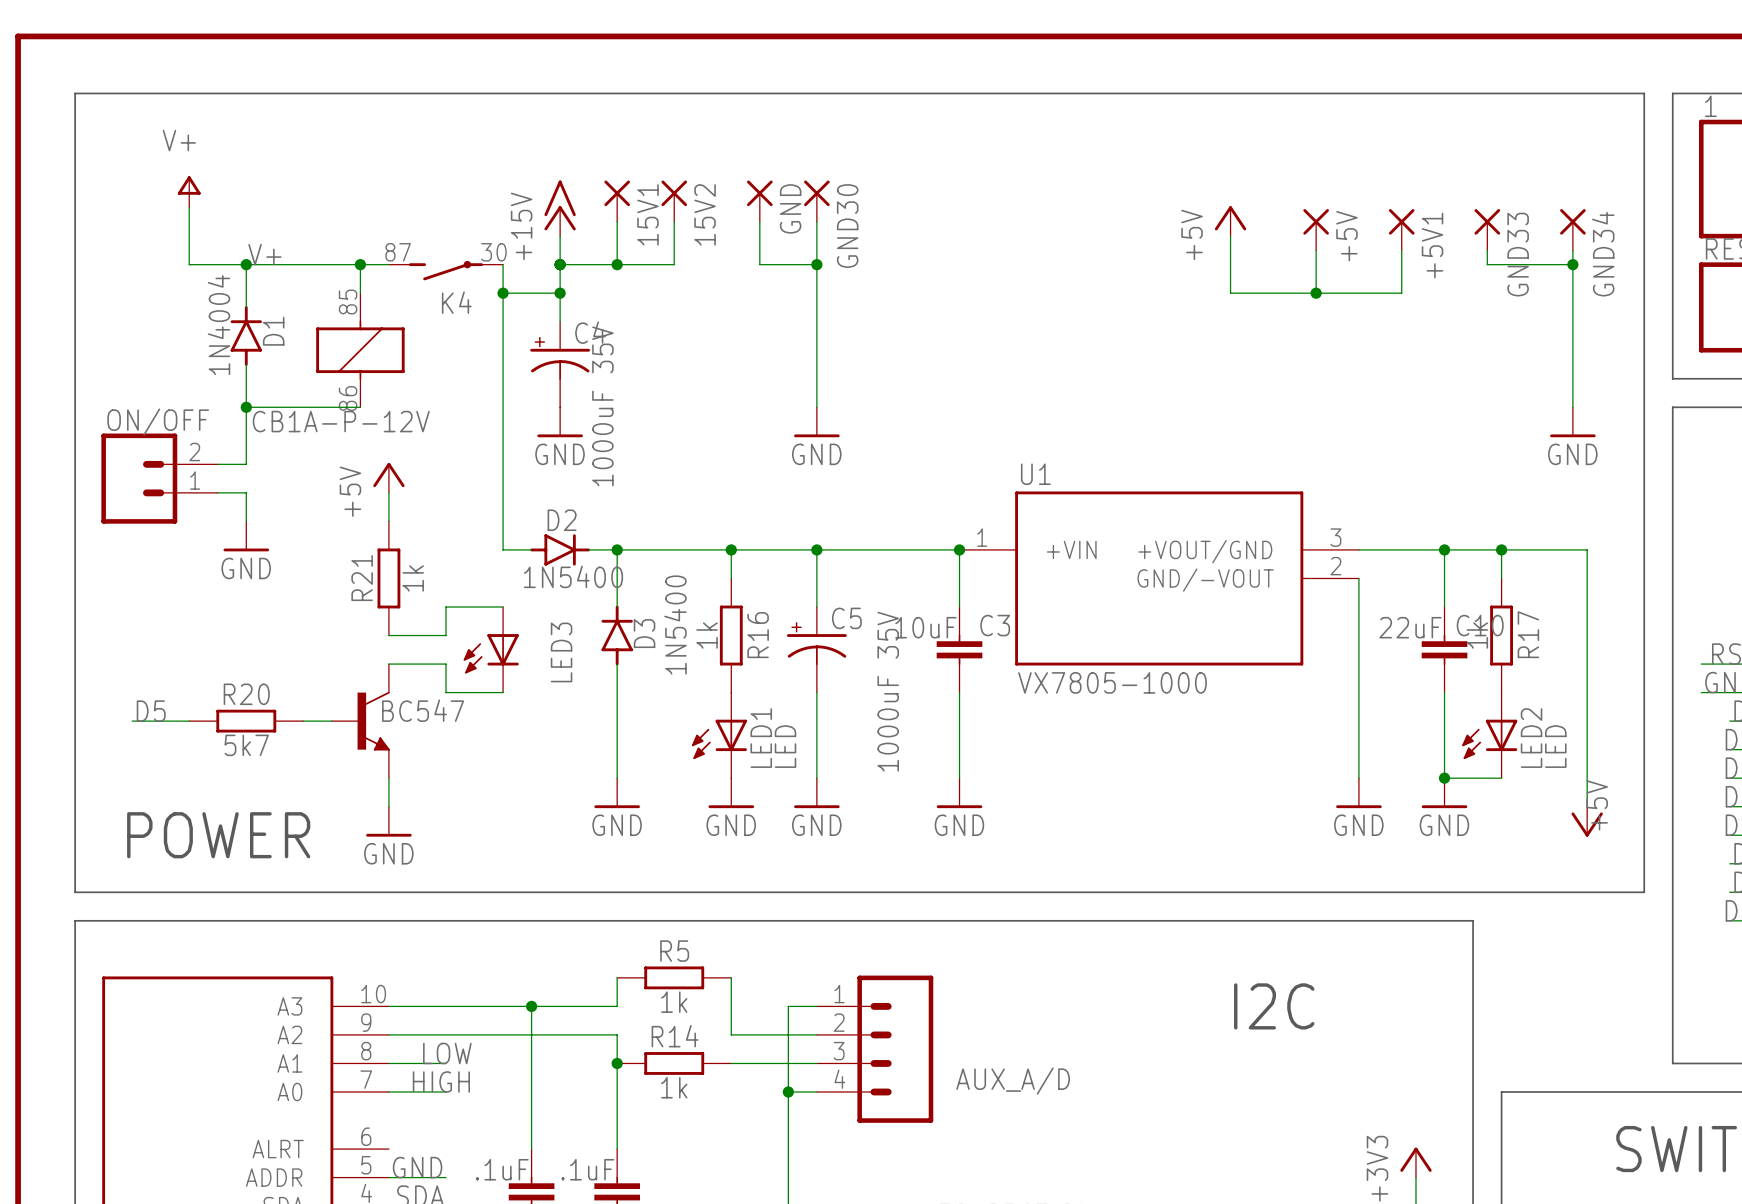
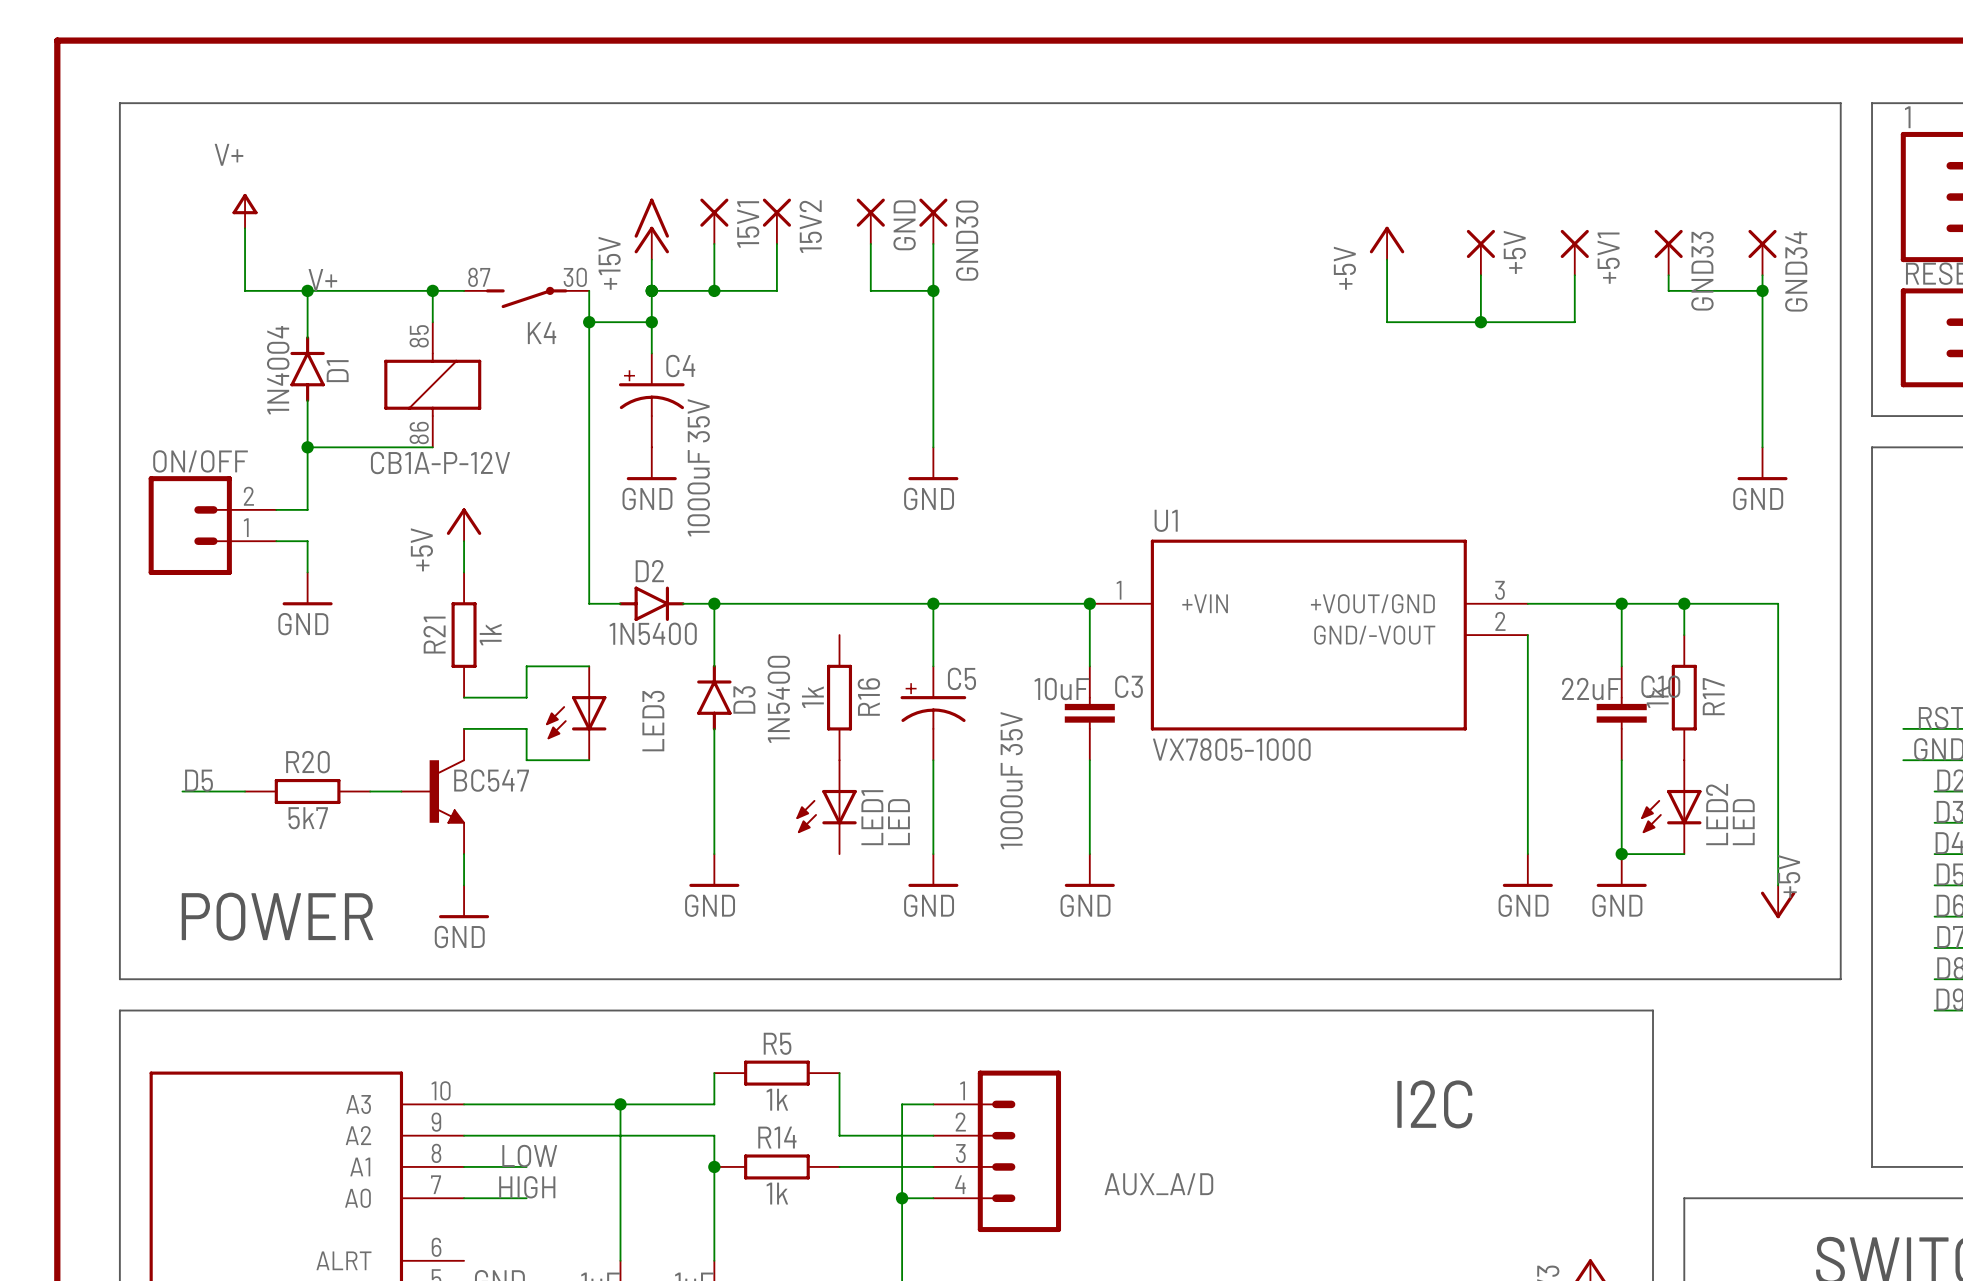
wire: (731, 549) (731, 578) -> none
junction: (731, 549) -> none
power symbol: GND (731, 793) -> none

